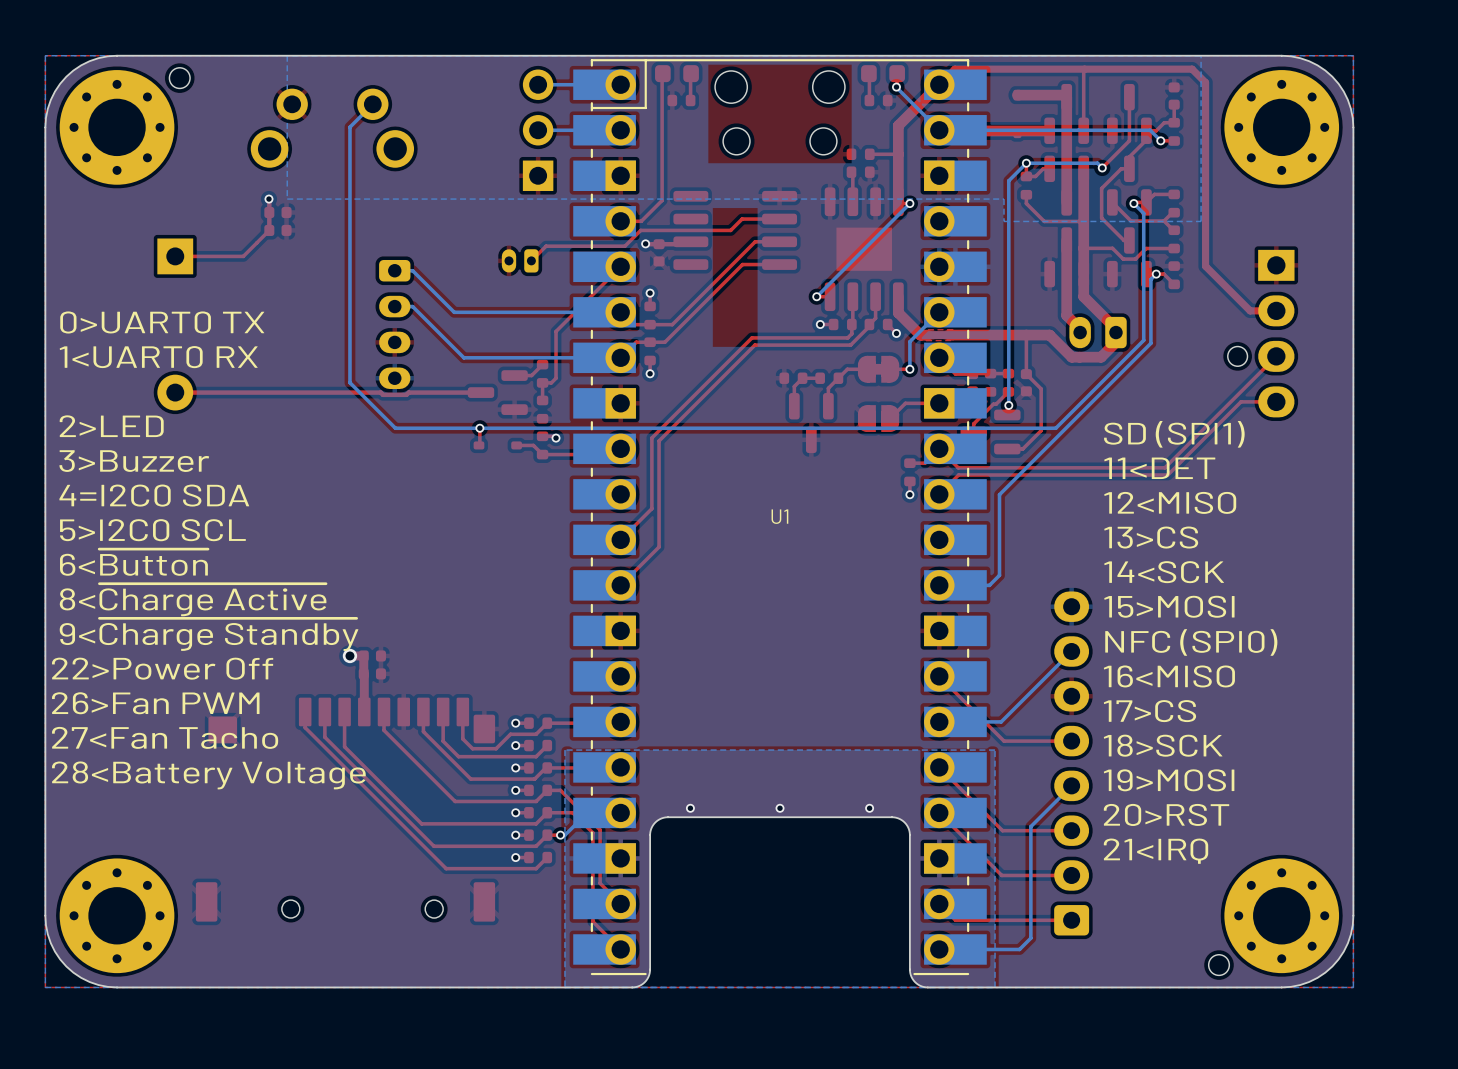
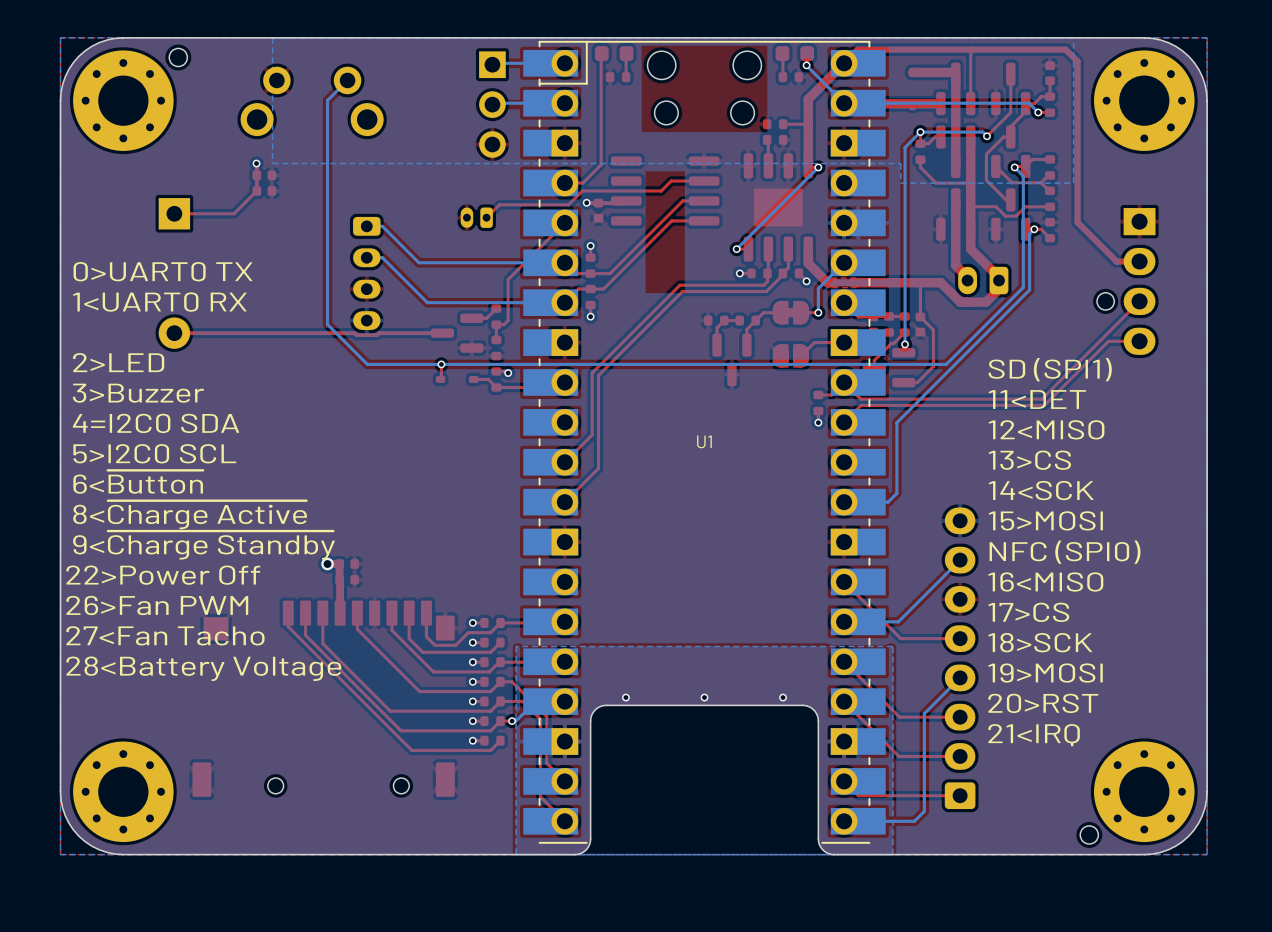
part rotation: 0° (538, 130) -> 180° (492, 104)

